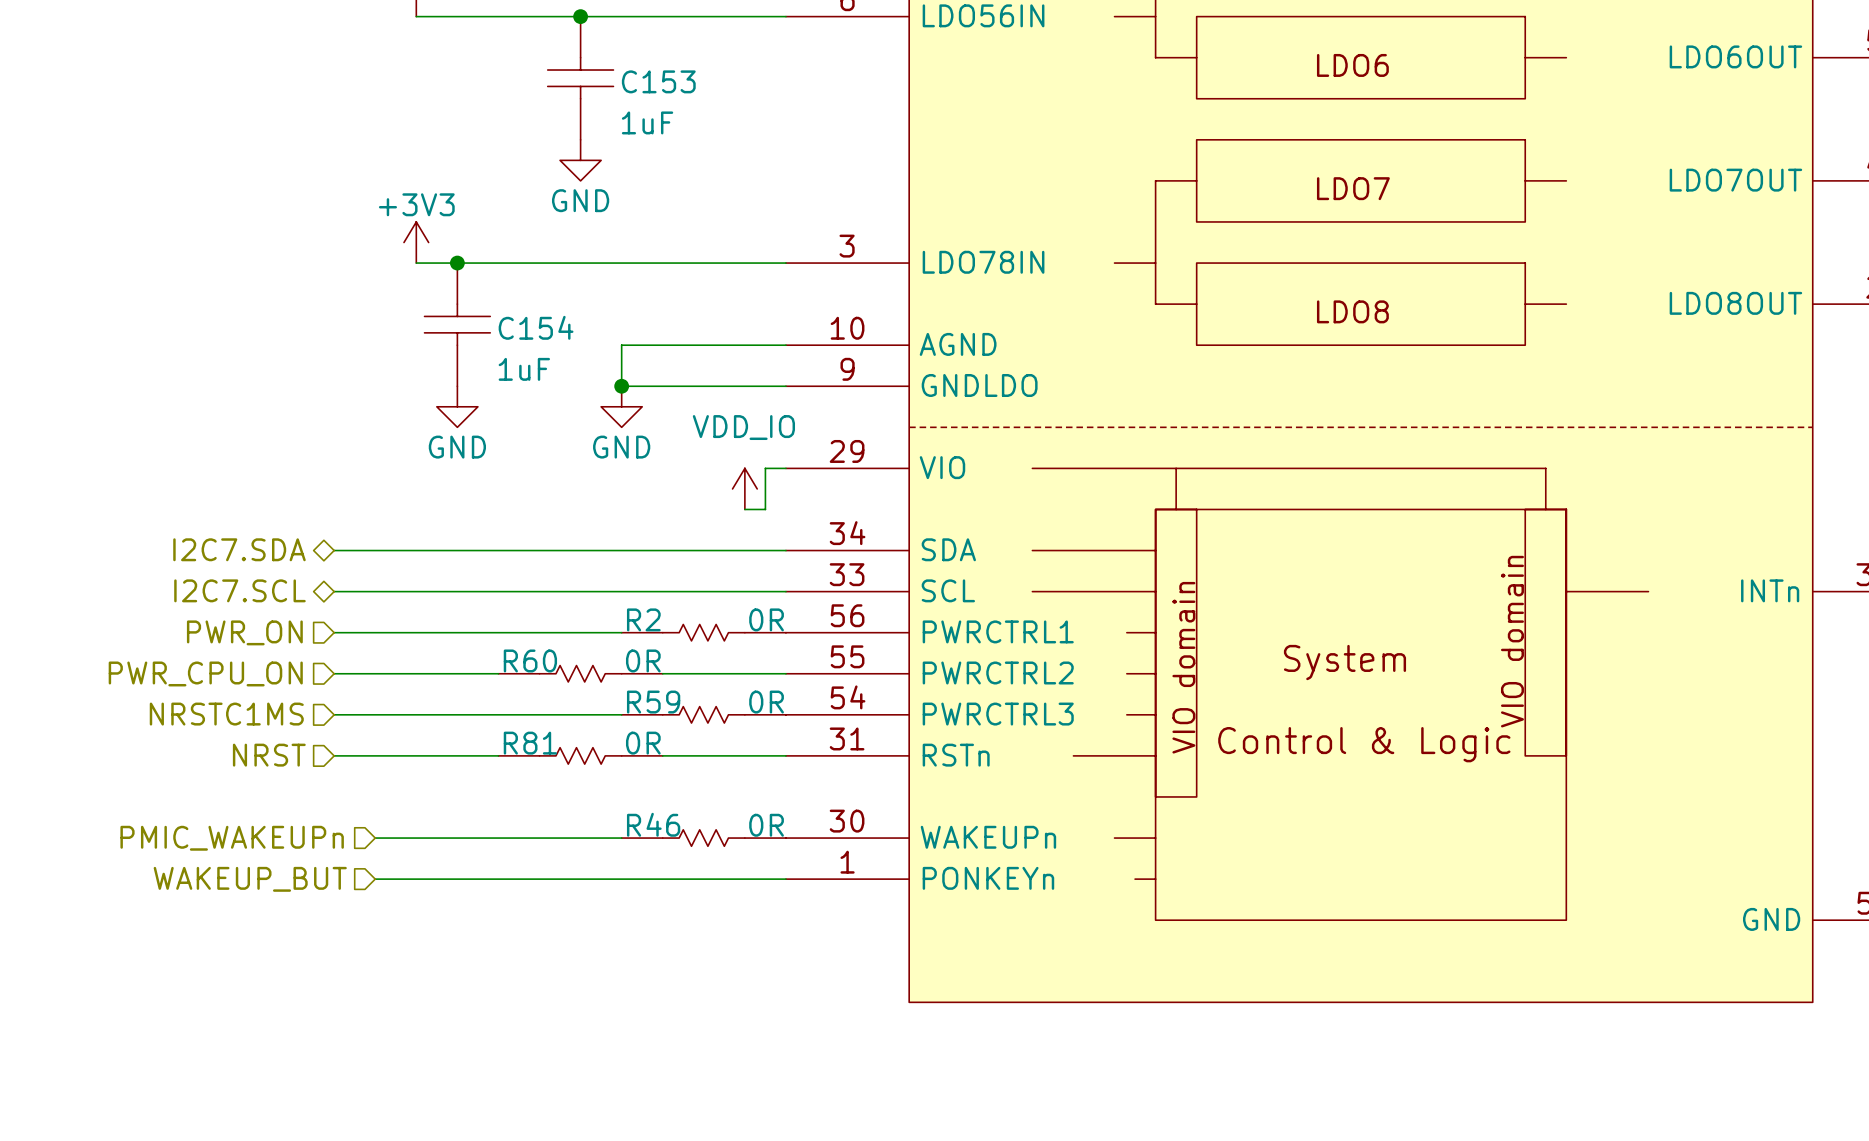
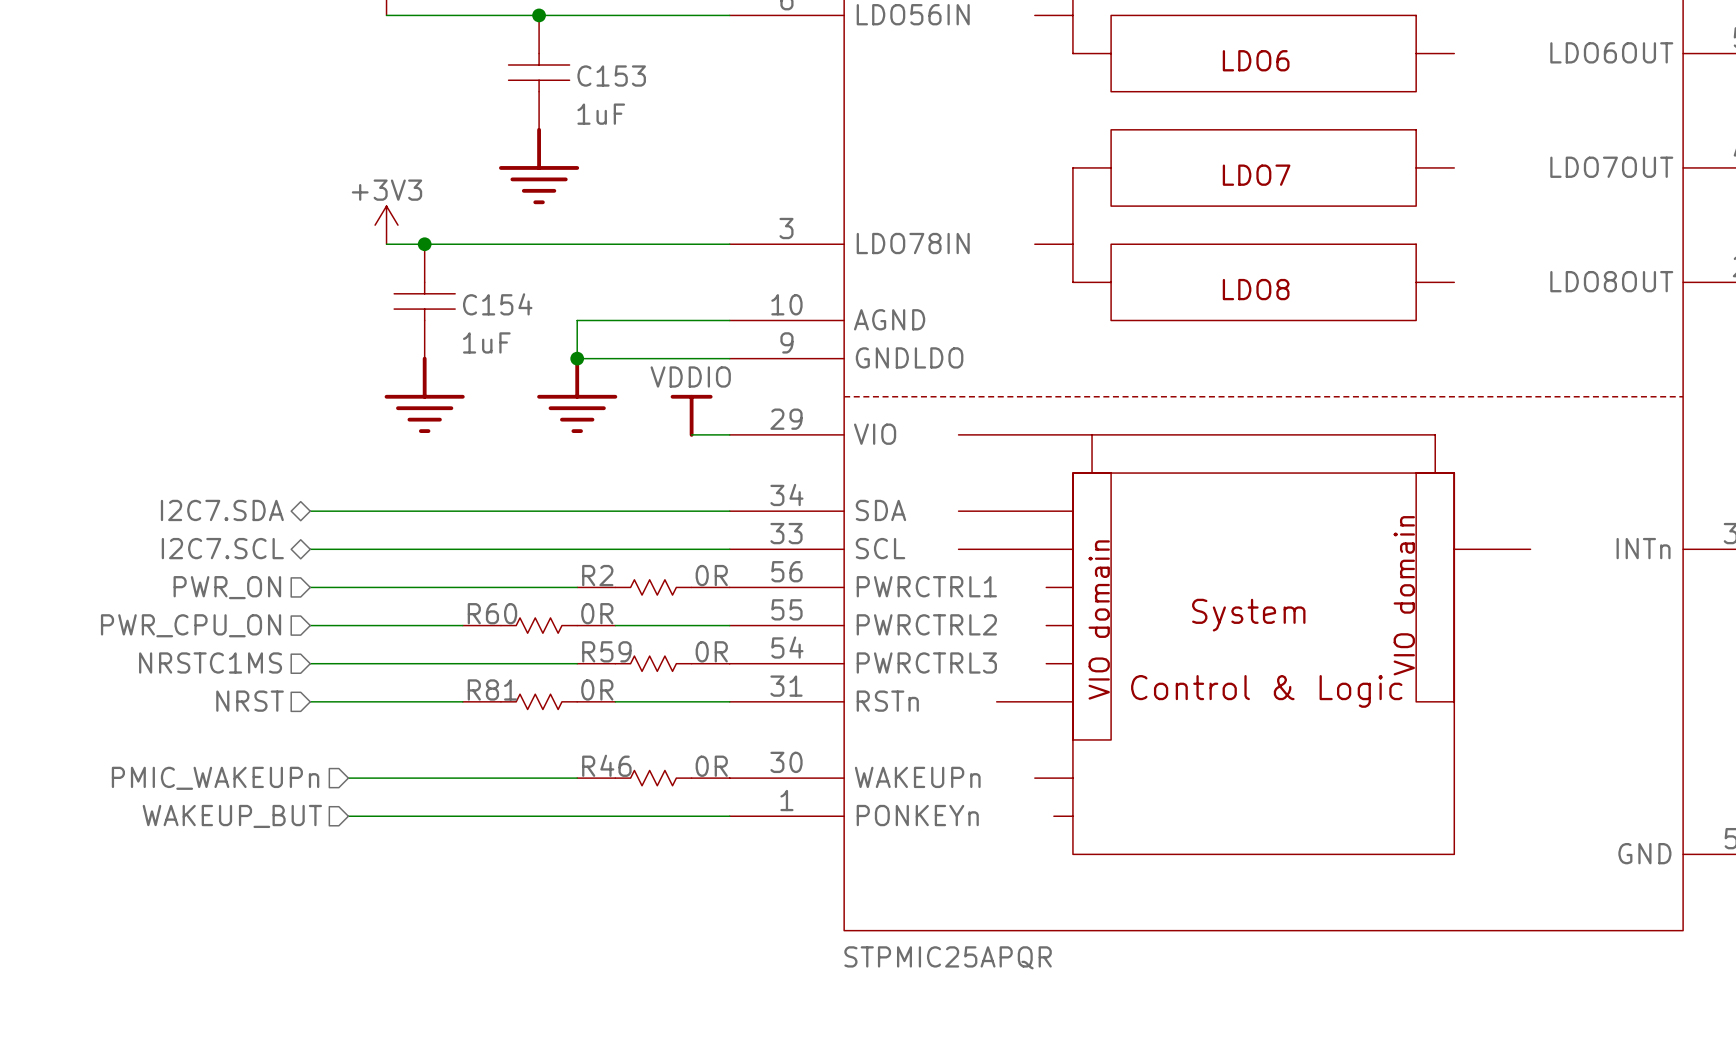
power symbol: GND (580, 160) -> none
power symbol: none -> (539, 166)
power symbol: GND (457, 406) -> none
power symbol: GND (621, 406) -> none
power symbol: none -> (424, 394)
power symbol: none -> (577, 394)
power symbol: none -> VDDIO (691, 415)
wire: (765, 468) (765, 509) (744, 509) -> (710, 434) (691, 434)
power symbol: VDD_IO (744, 488) -> none
part text: none -> STPMIC25APQR (948, 957)

